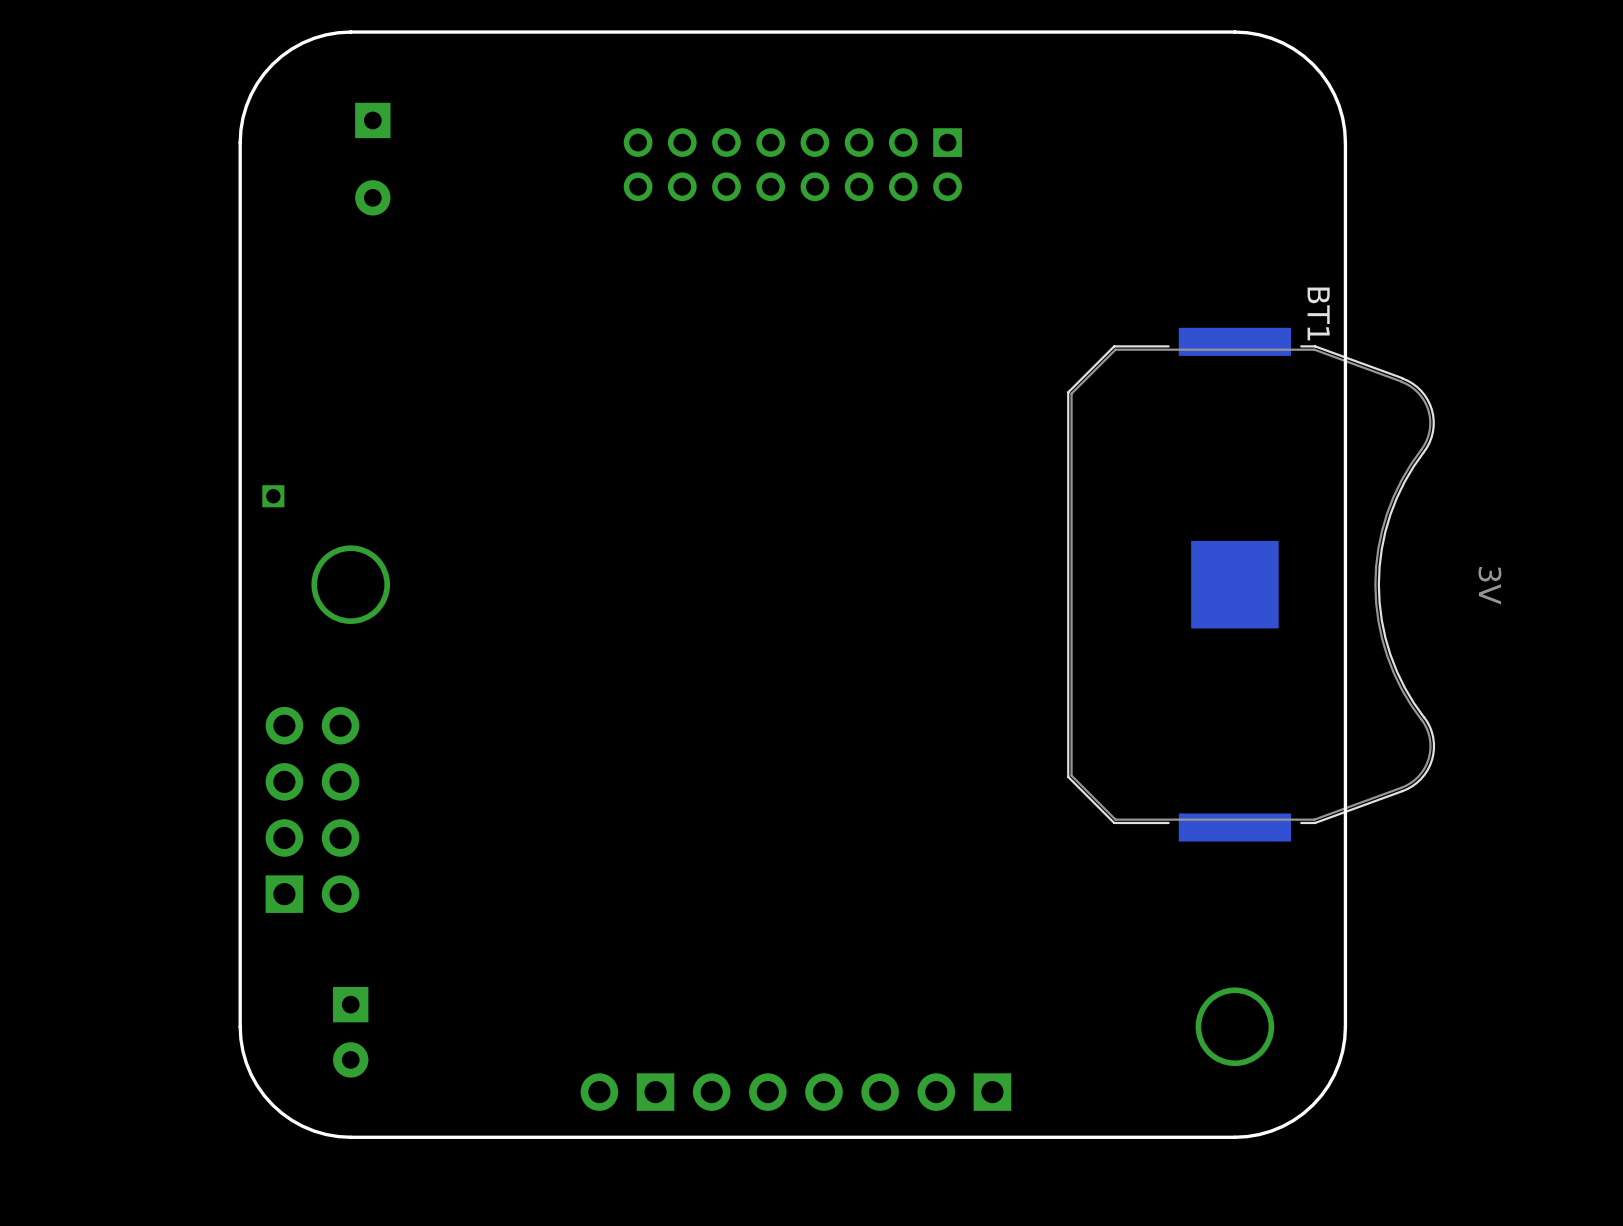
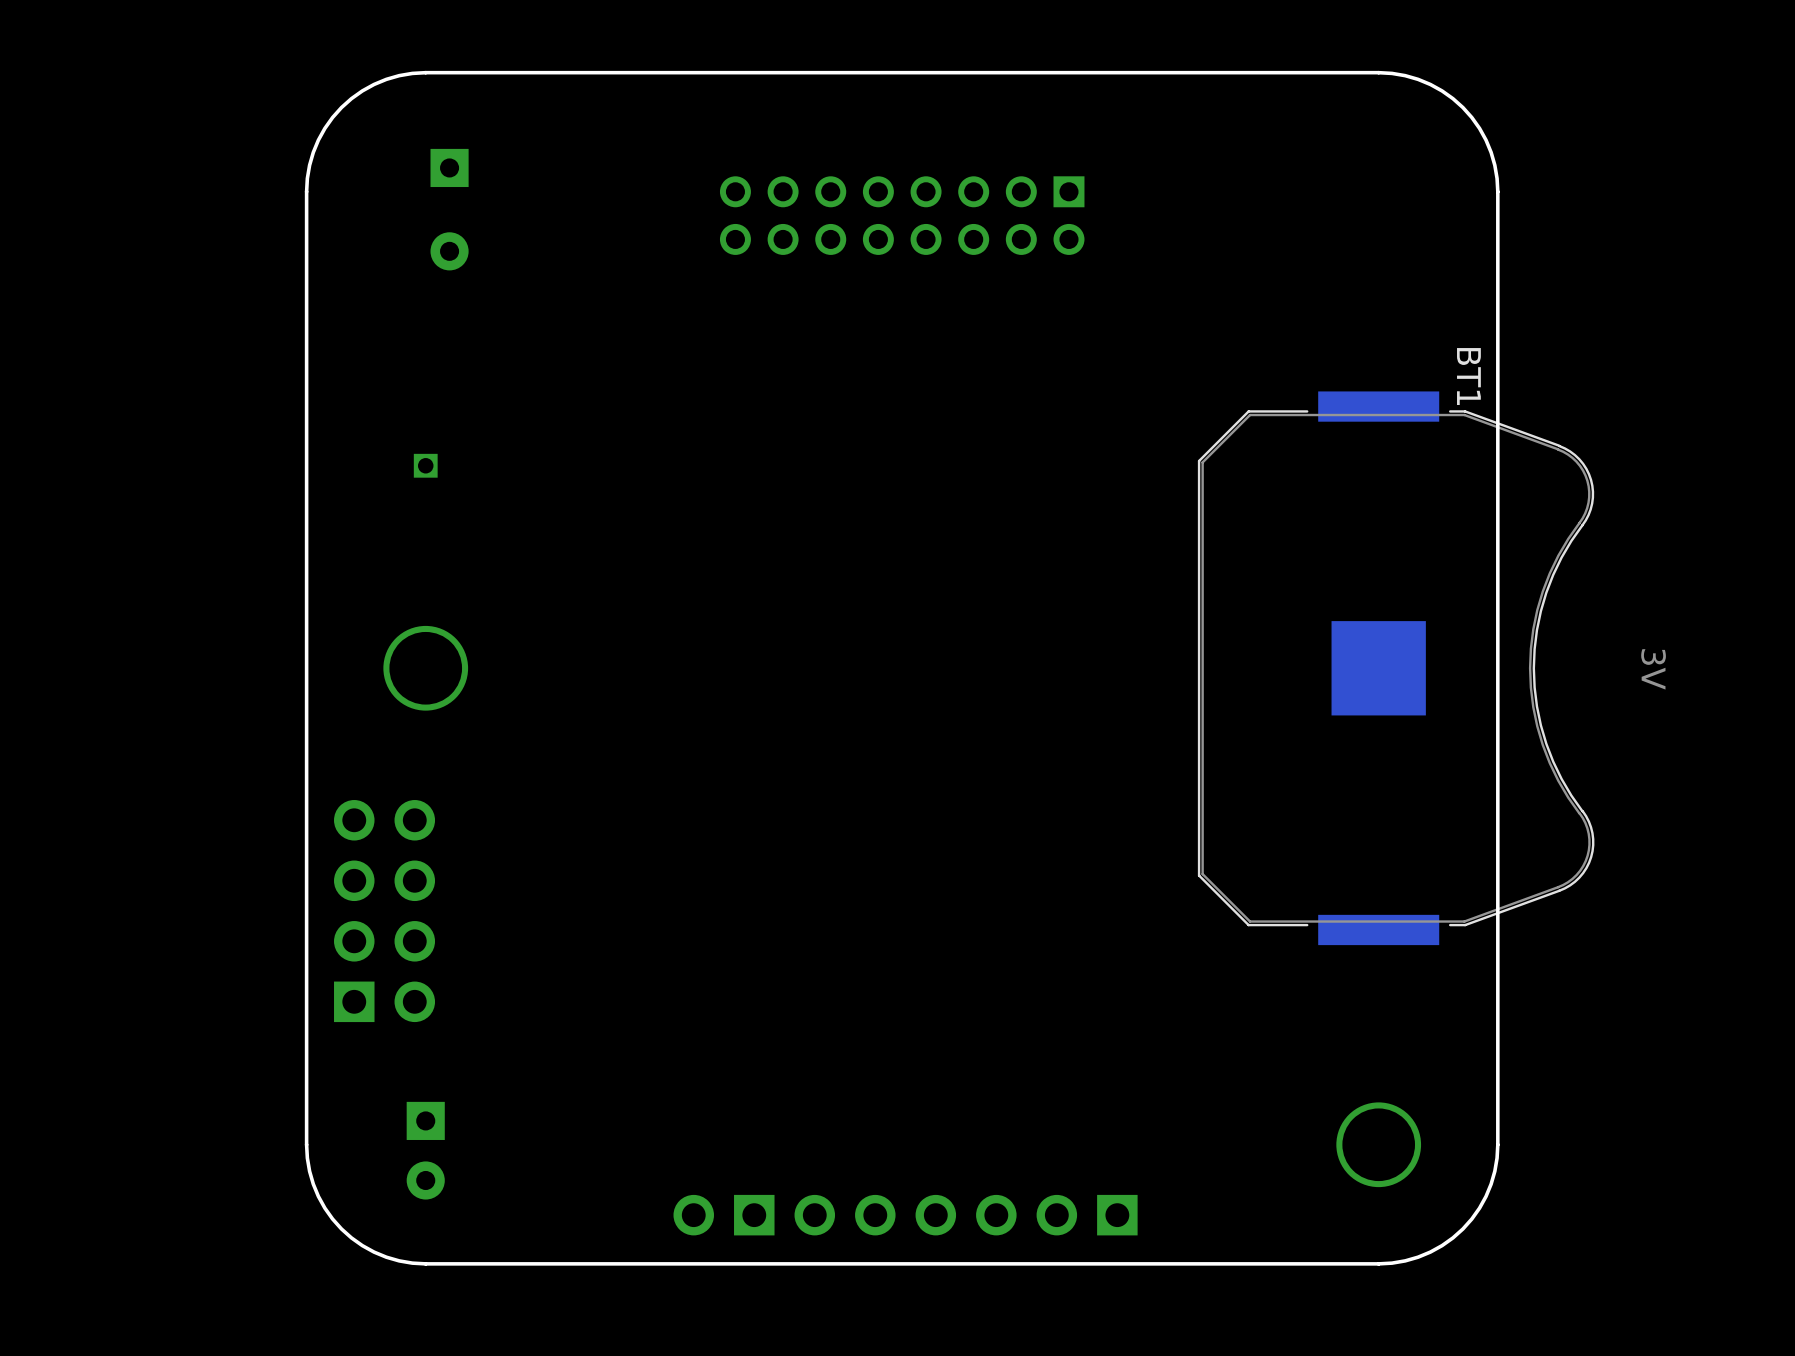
part position: (273, 496) -> (425, 465)

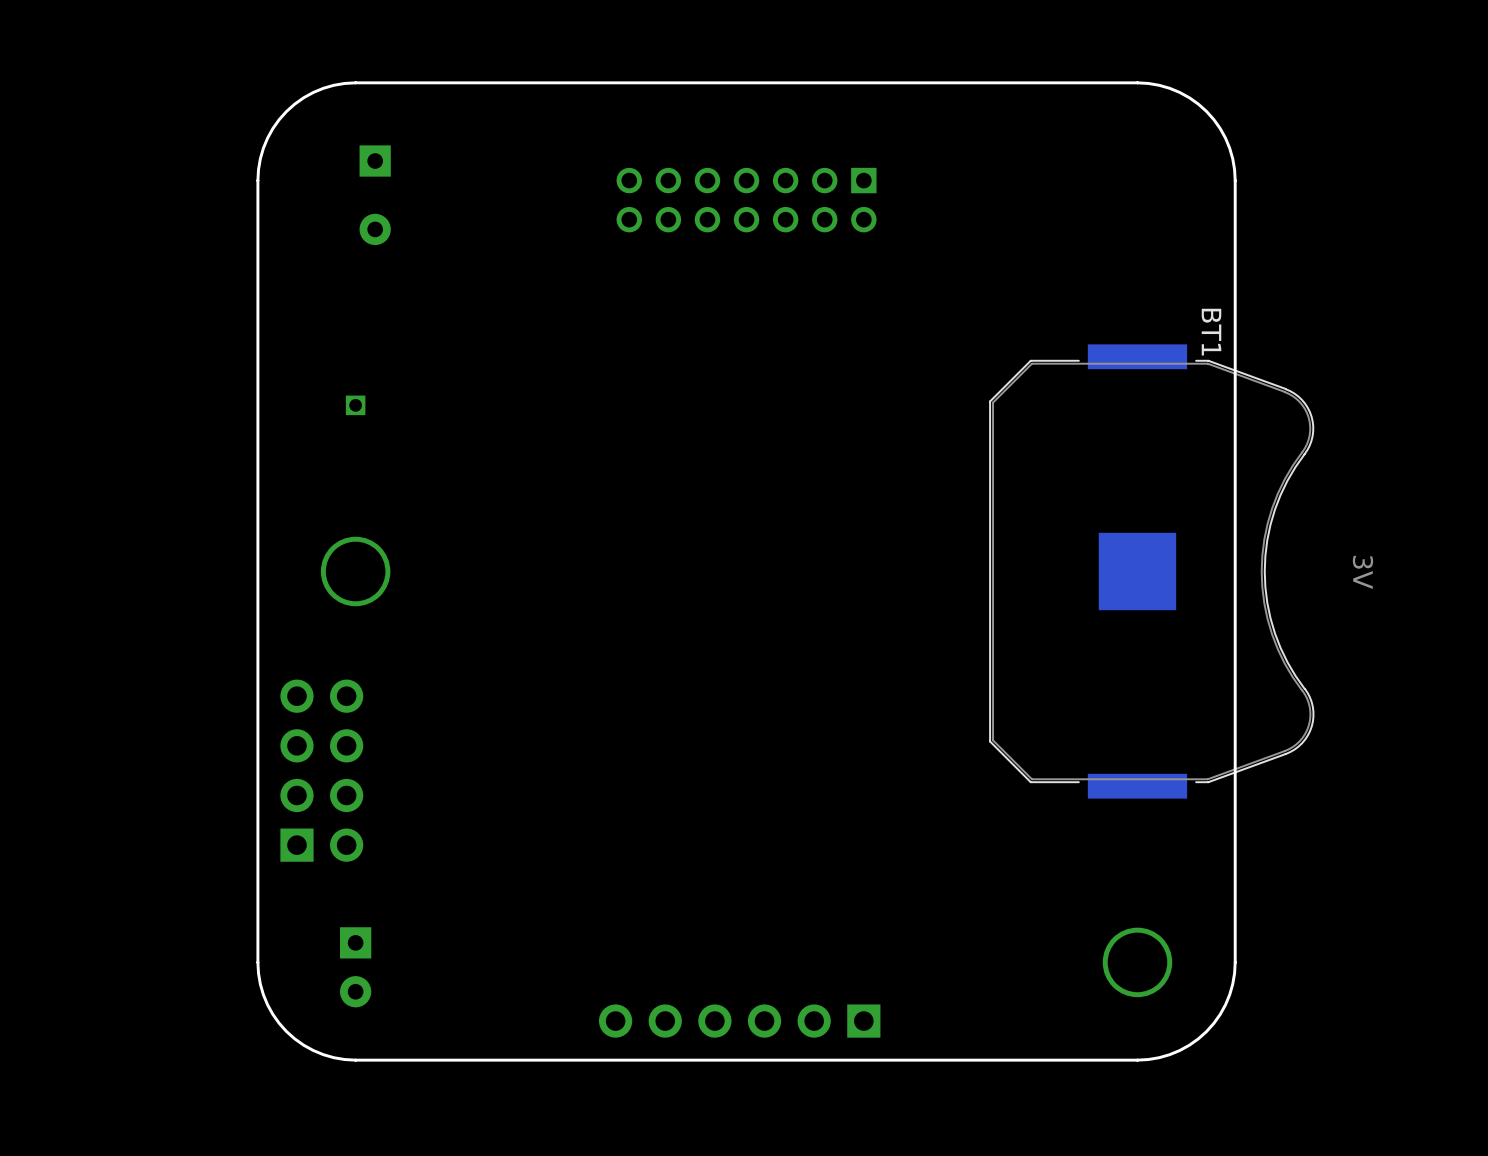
part footprint: [719, 176, 1085, 255] -> [616, 167, 877, 233]
part: (724, 1215) -> none
part position: (966, 1215) -> (739, 1021)

